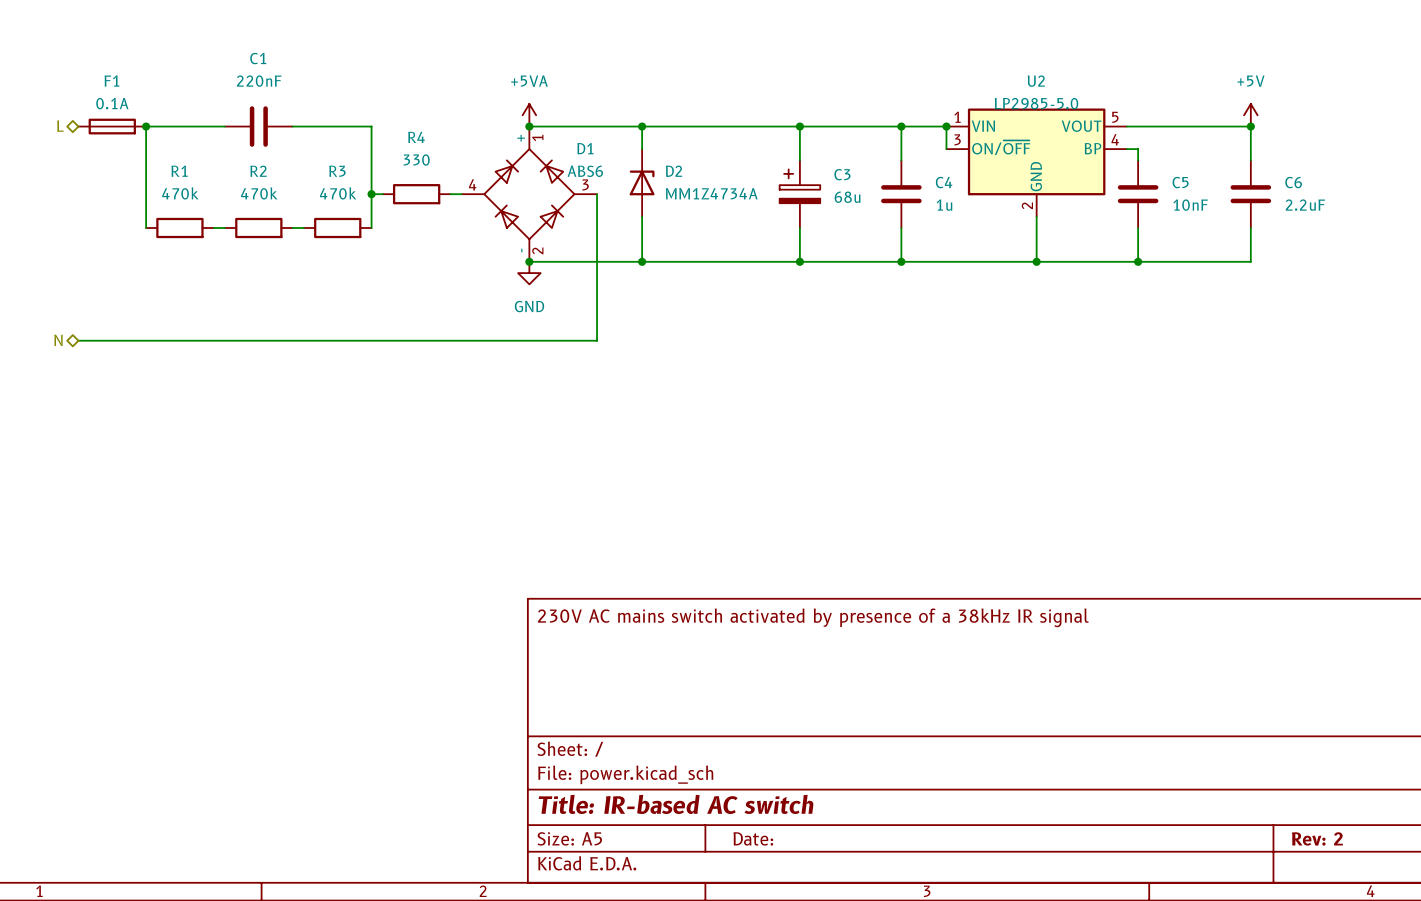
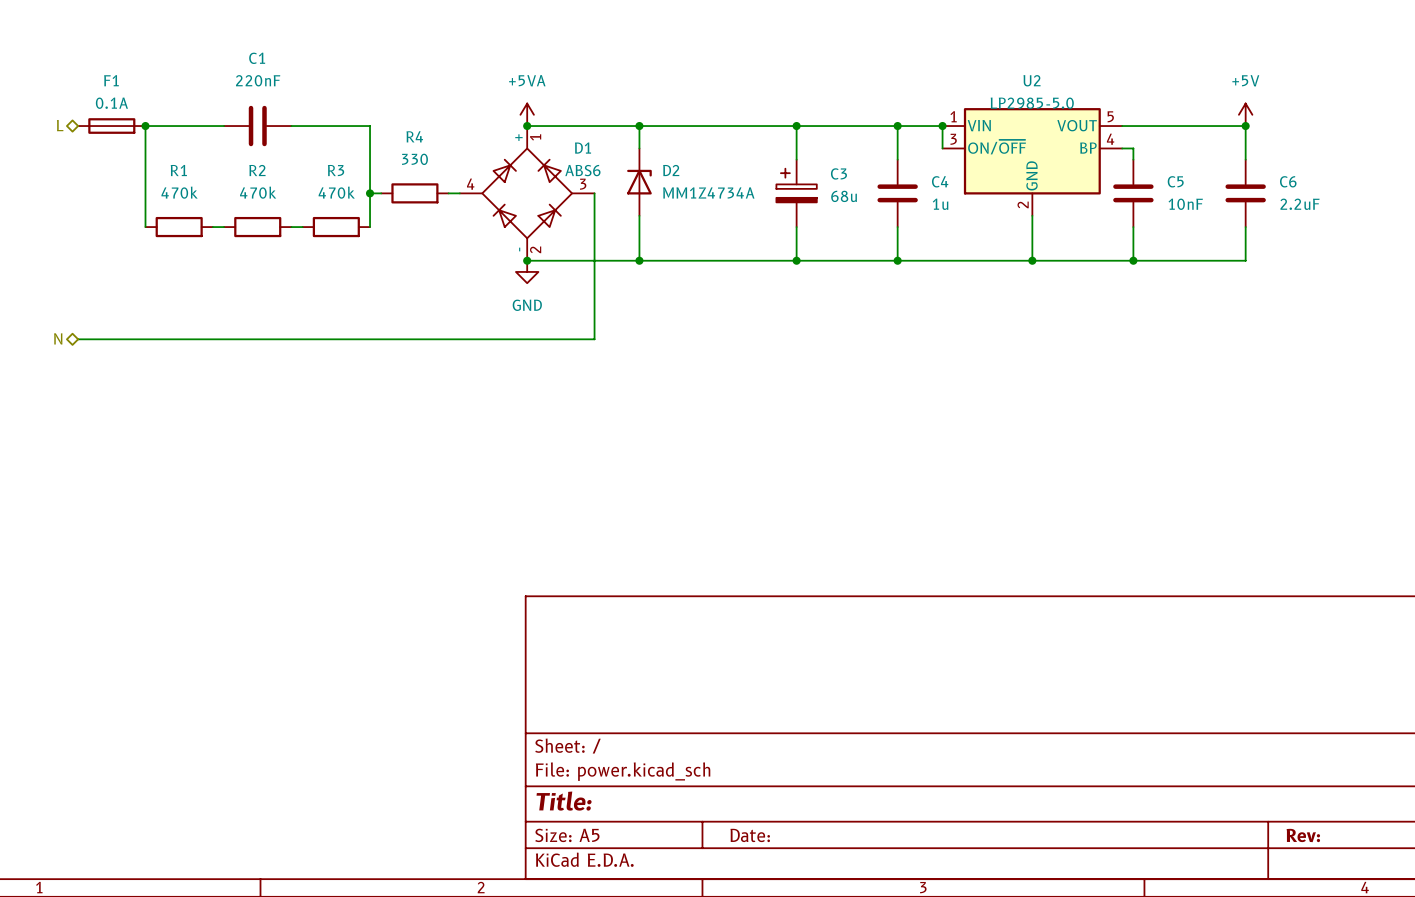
title block: 230V AC mains switch activated by presence of a 38kHz IR signal (813, 617) -> none
title block: Title: IR-based AC switch (676, 804) -> Title: (564, 801)
title block: Rev: 2 (1317, 838) -> Rev: (1303, 835)

